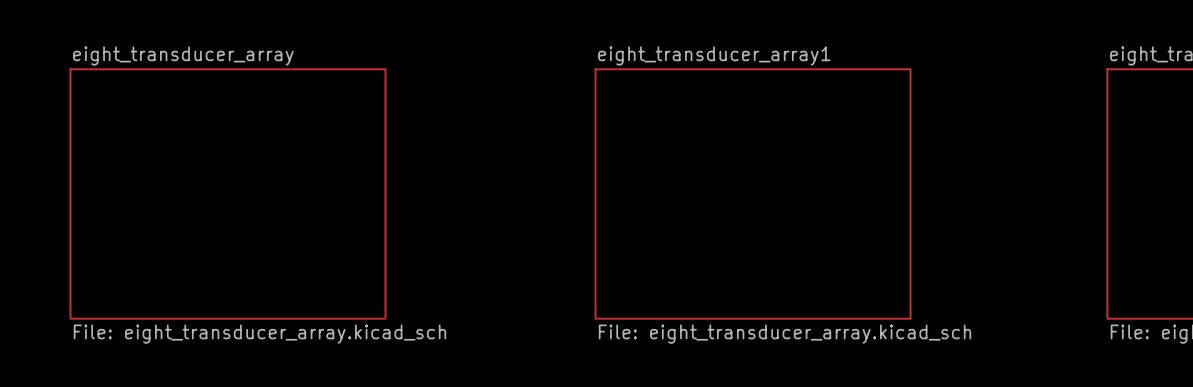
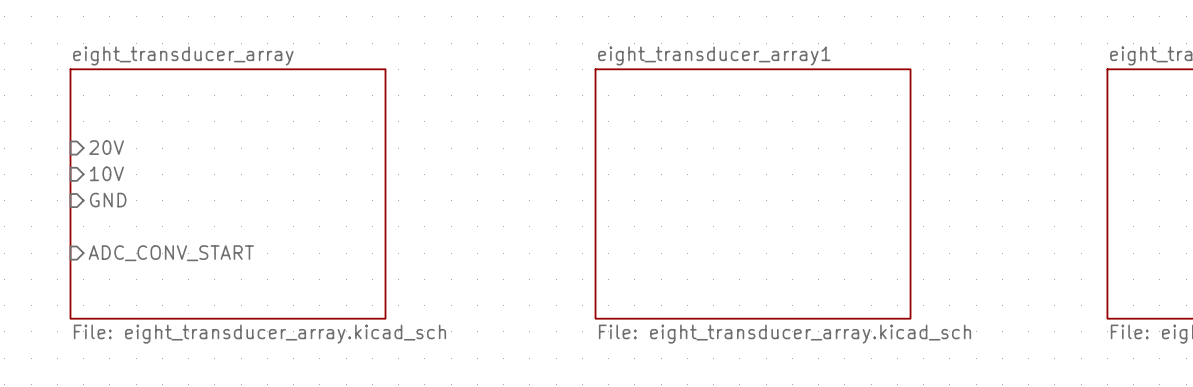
sheet pin: none -> 20V (106, 147)
sheet pin: none -> 10V (106, 173)
sheet pin: none -> GND (108, 200)
sheet pin: none -> ADC_CONV_START (171, 253)

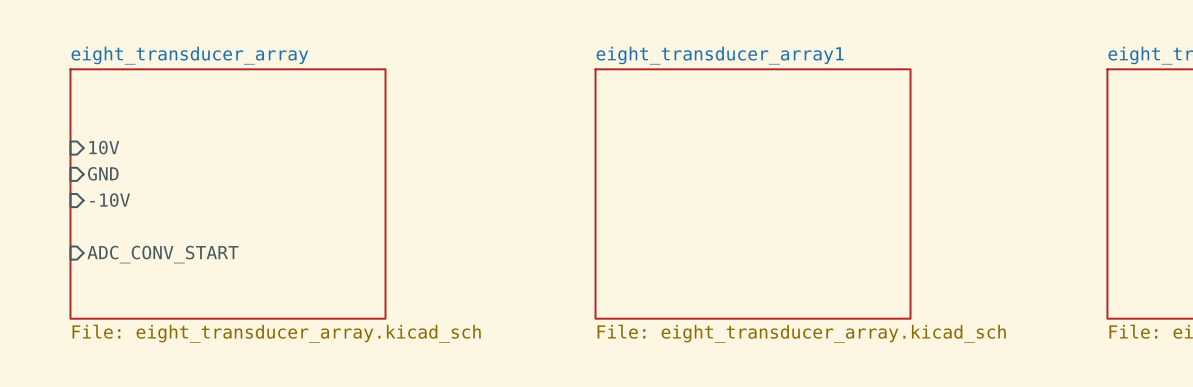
sheet pin: 20V (106, 147) -> 10V (104, 147)
sheet pin: 10V (106, 173) -> GND (103, 173)
sheet pin: GND (108, 200) -> -10V (110, 200)

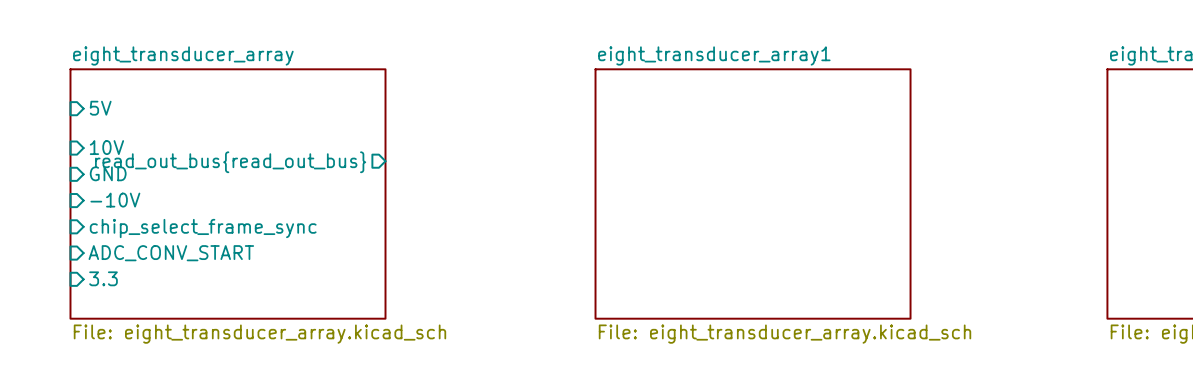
sheet pin: none -> 5V (100, 108)
sheet pin: none -> read_out_bus{read_out_bus} (230, 162)
sheet pin: none -> chip_select_frame_sync (203, 228)
sheet pin: none -> 3.3 (103, 278)

